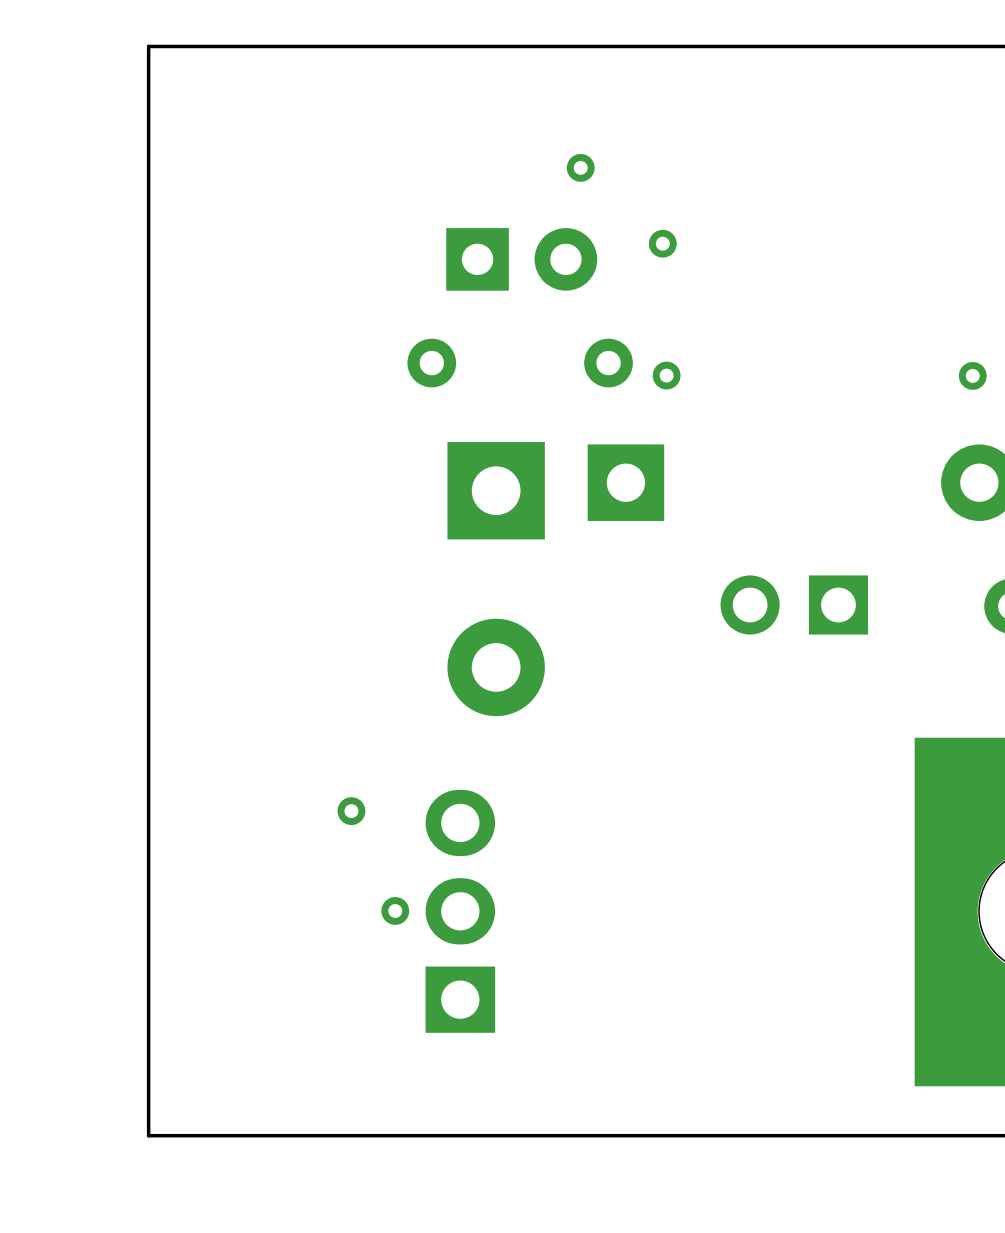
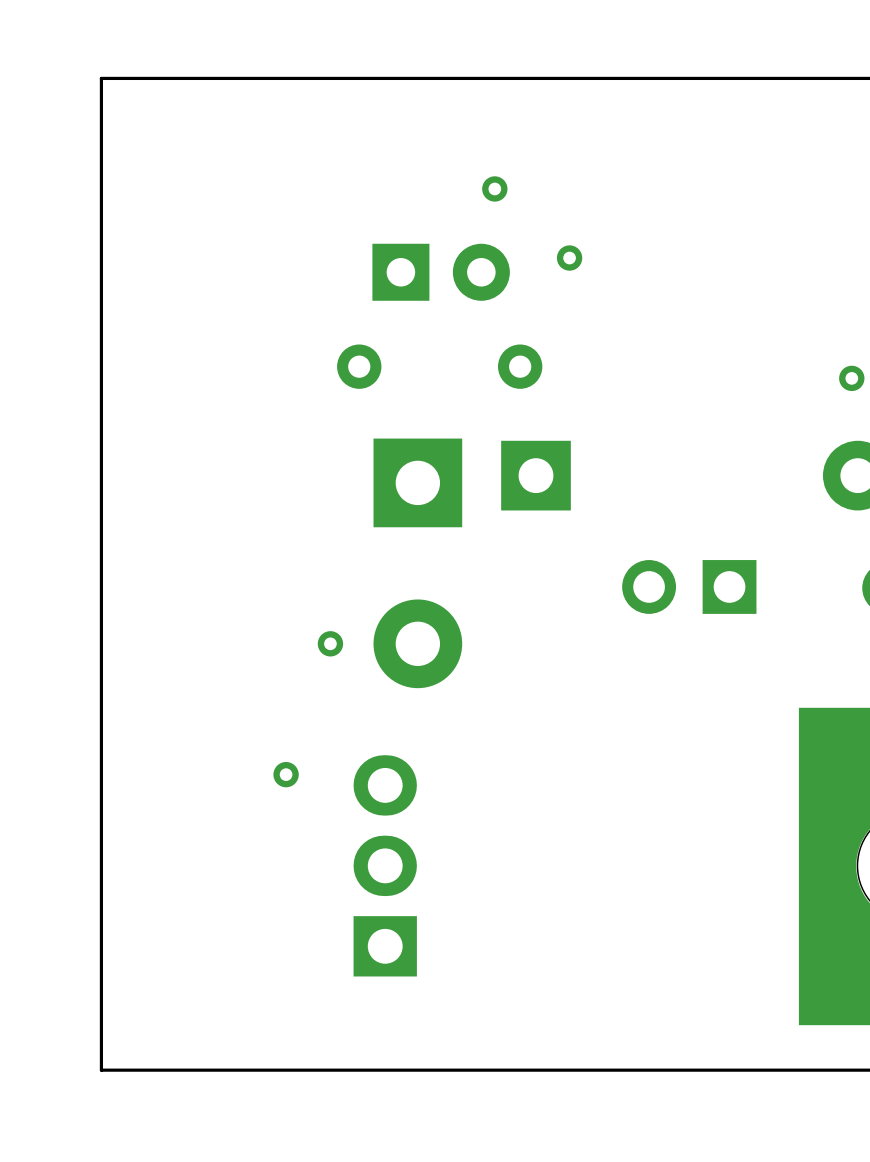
via: (666, 375) -> none
via: none -> (330, 643)
via: (395, 910) -> none

